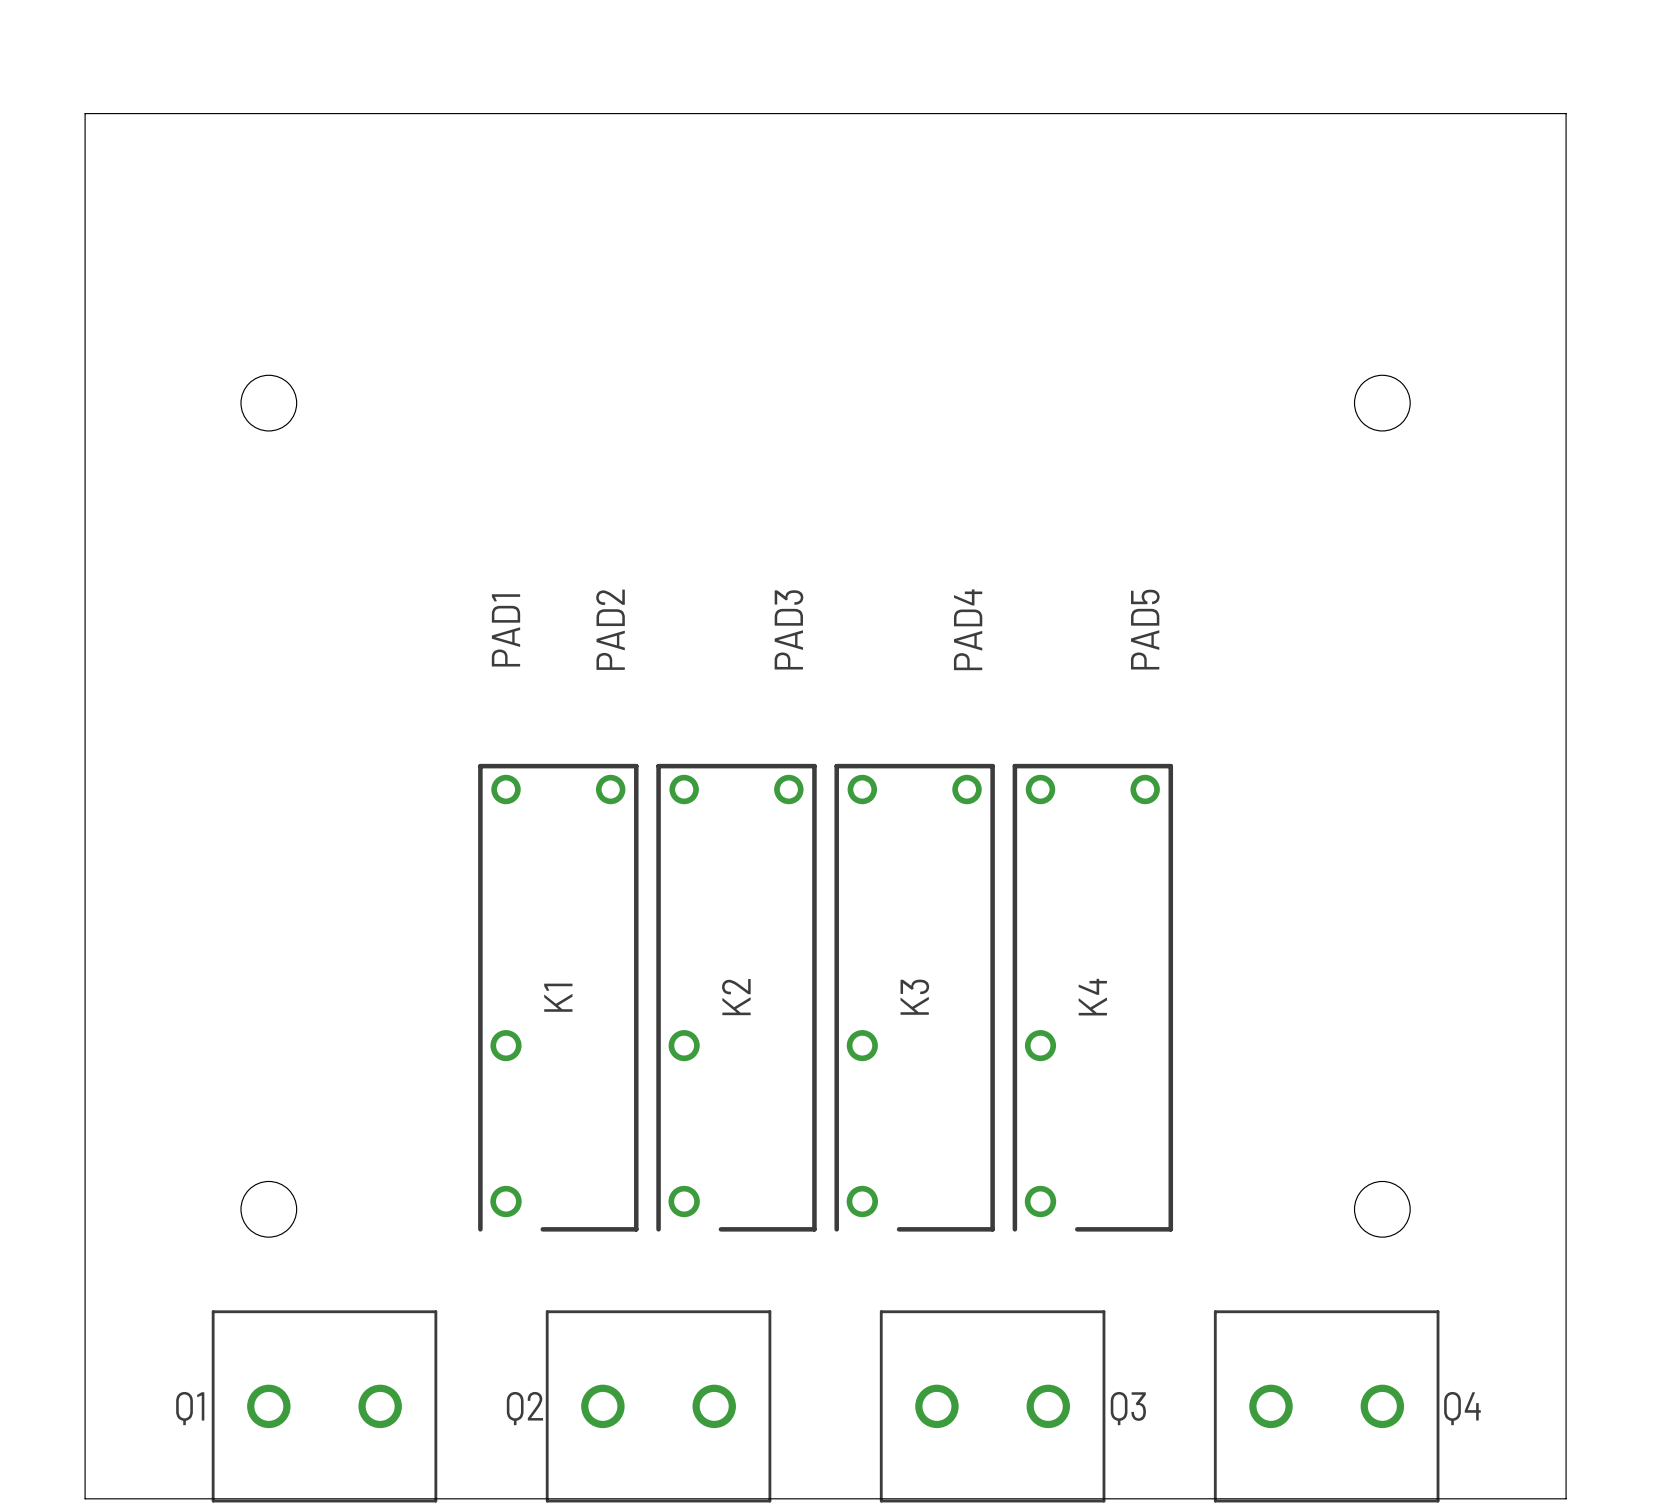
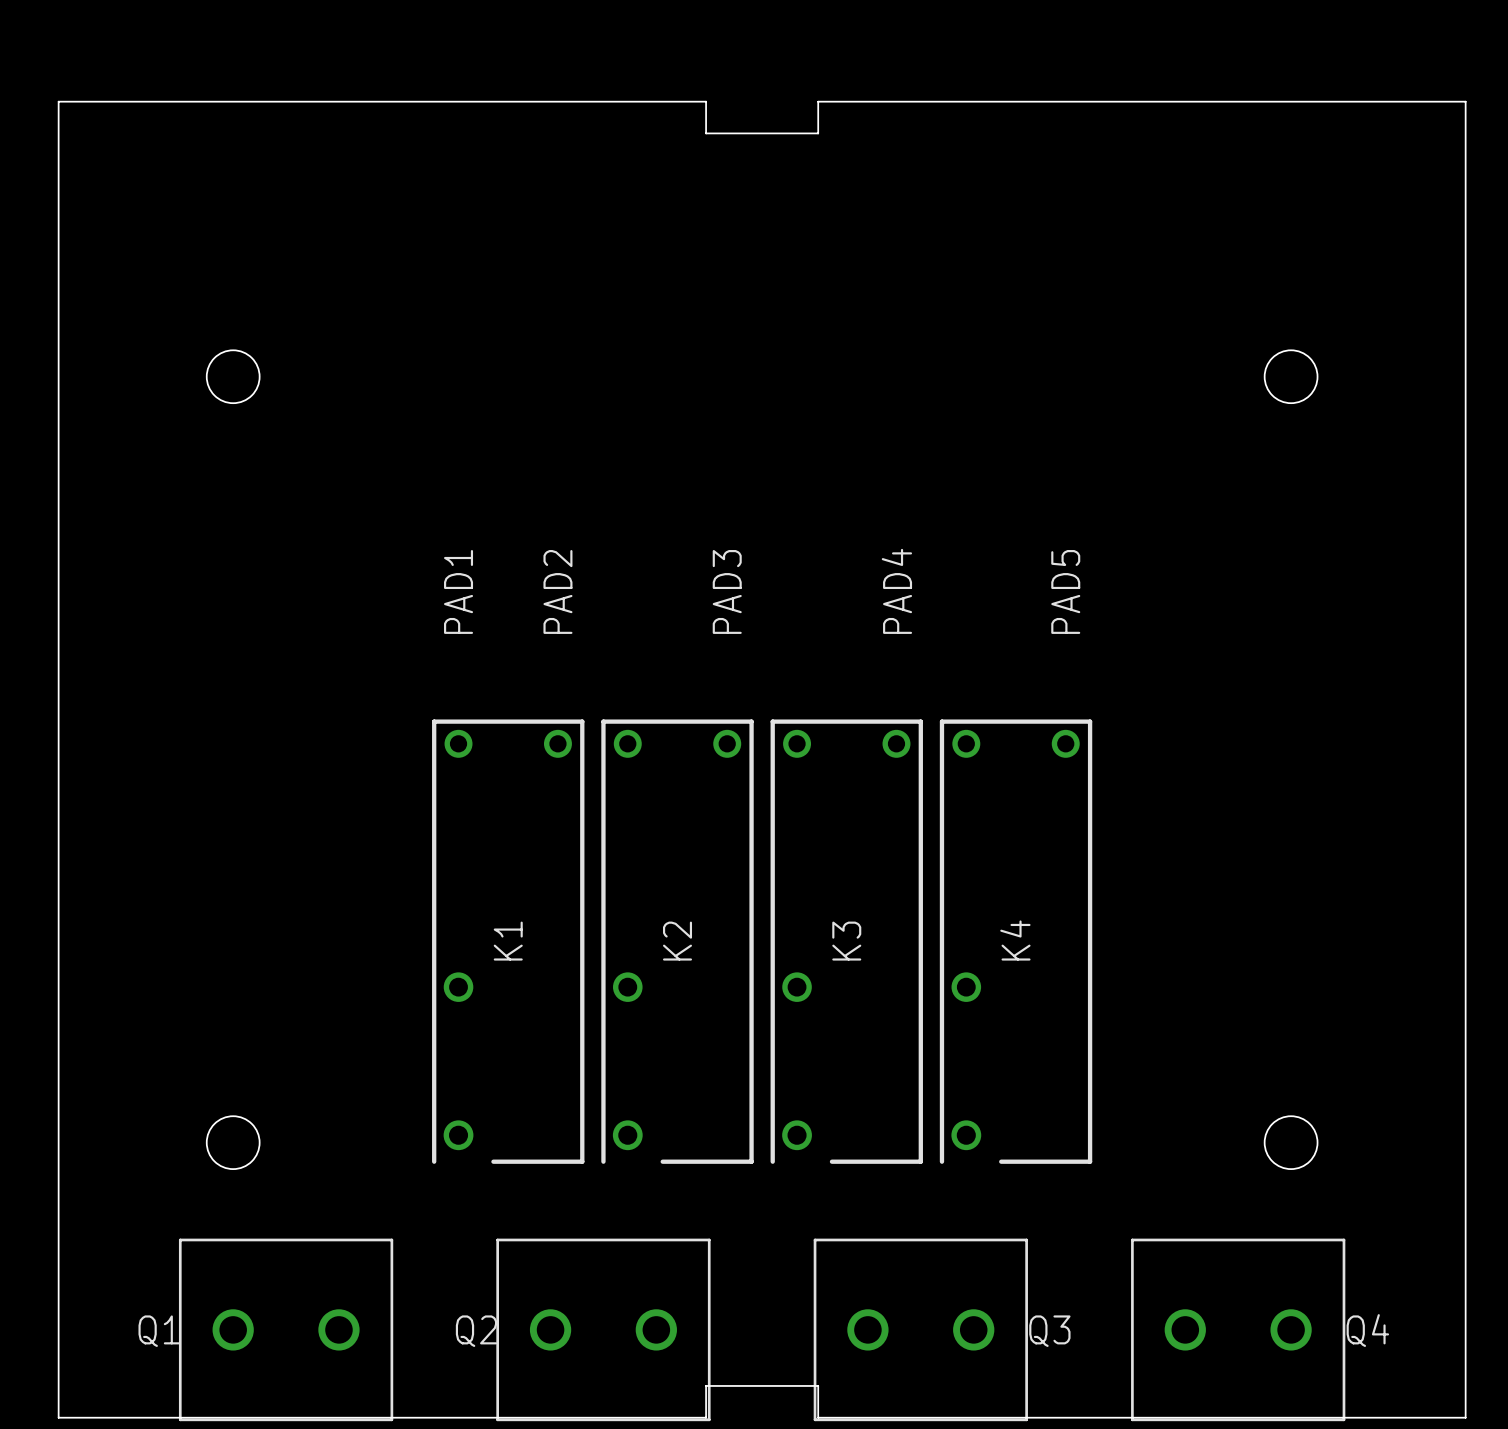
board edge: (766, 113) (884, 113) -> (706, 101) (706, 133) (818, 133) (818, 101)
board edge: (766, 1498) (884, 1498) -> (706, 1417) (706, 1385) (818, 1385) (818, 1417)

